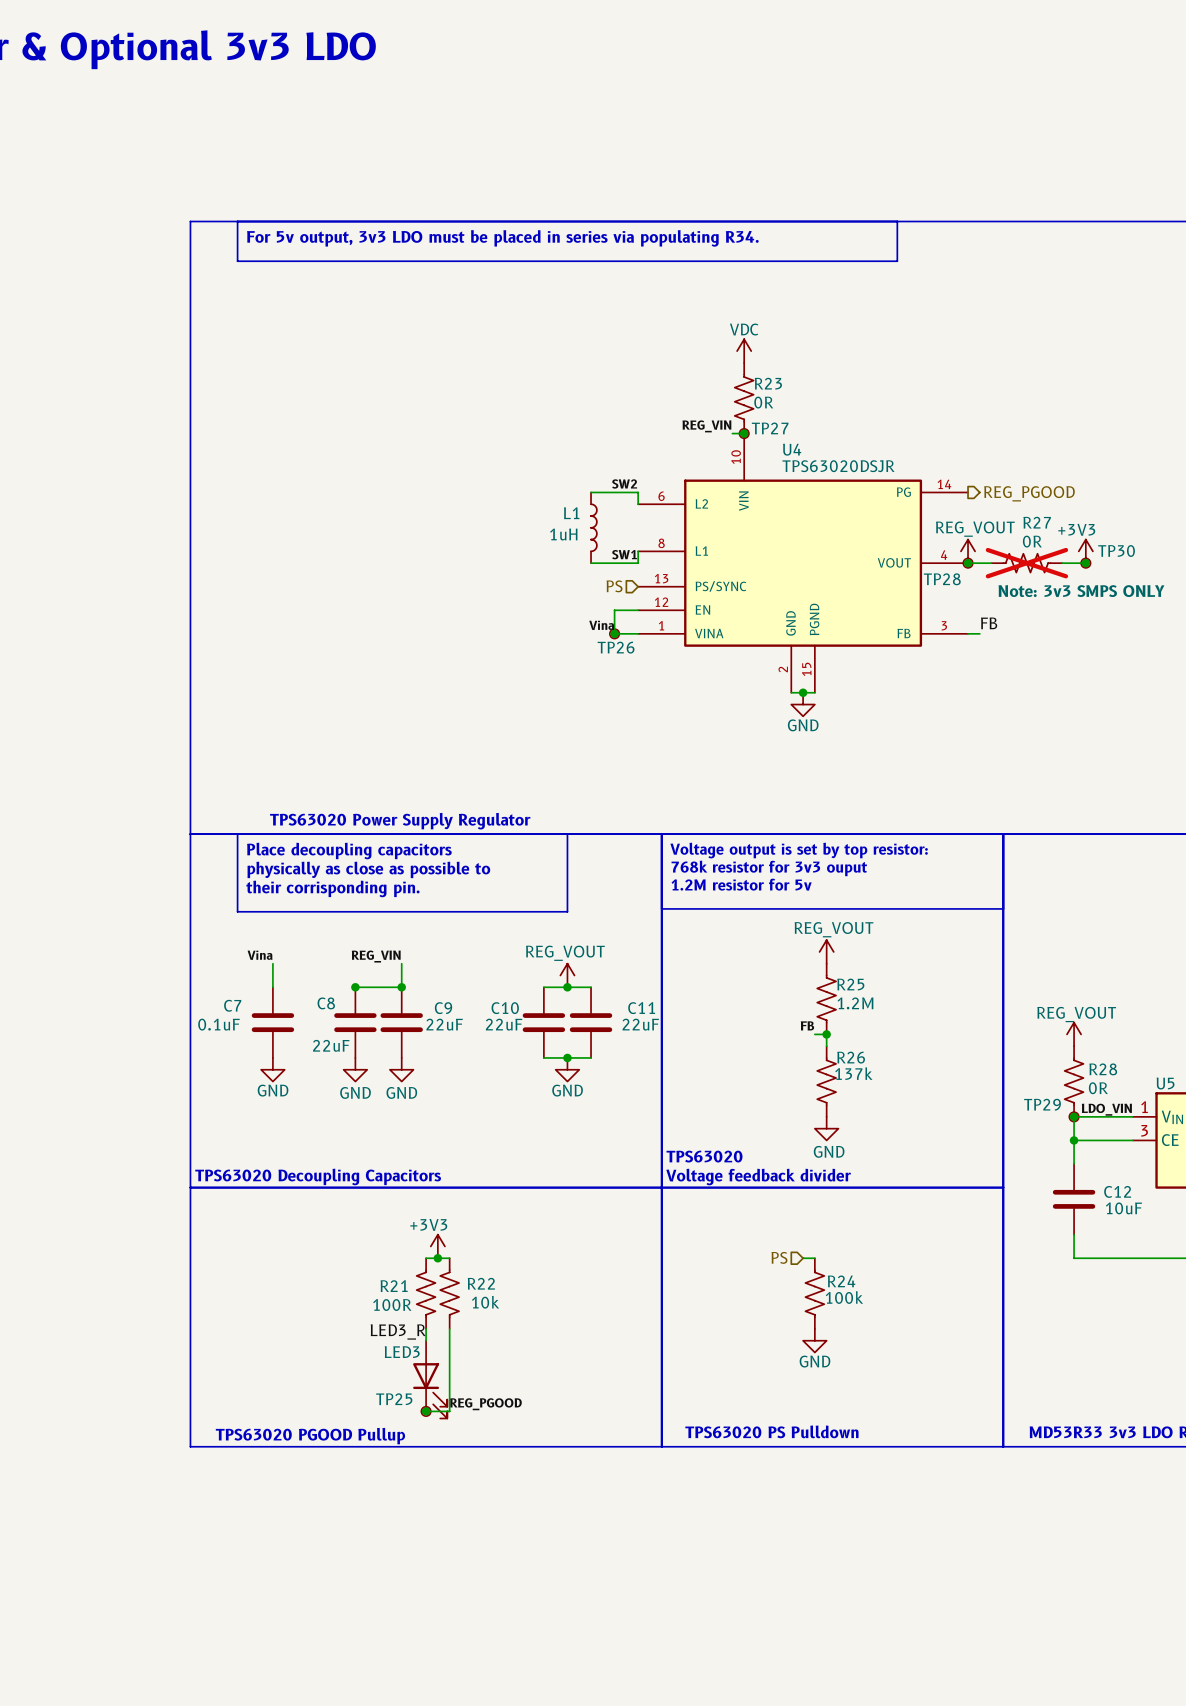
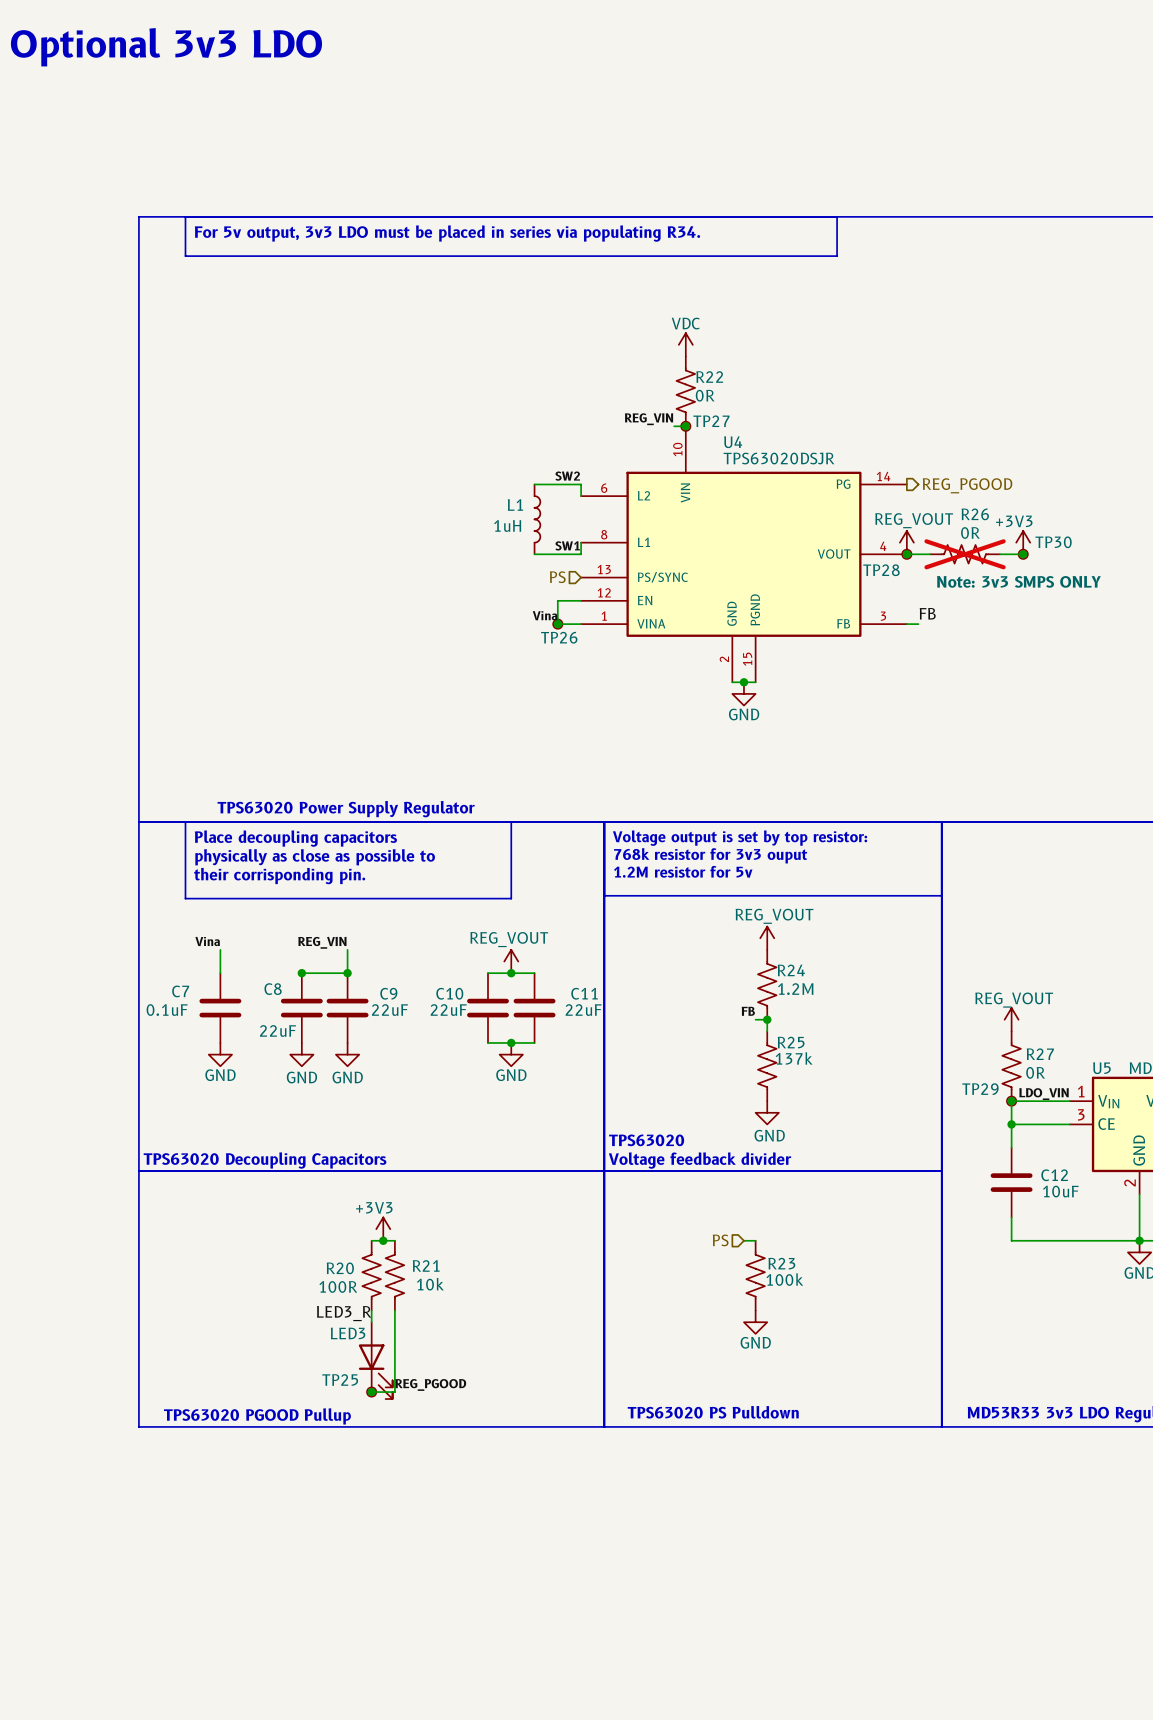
R23 name: R23 (768, 383) -> R22 (709, 377)
R27 name: R27 (1037, 522) -> R26 (975, 514)
R25 name: R25 (850, 984) -> R24 (791, 970)
R26 name: R26 (851, 1057) -> R25 (791, 1042)
R28 name: R28 (1103, 1069) -> R27 (1040, 1054)
R24 name: R24 (841, 1281) -> R23 (781, 1263)
R22 name: R22 (481, 1283) -> R21 (426, 1265)
R21 name: R21 (394, 1286) -> R20 (340, 1268)

